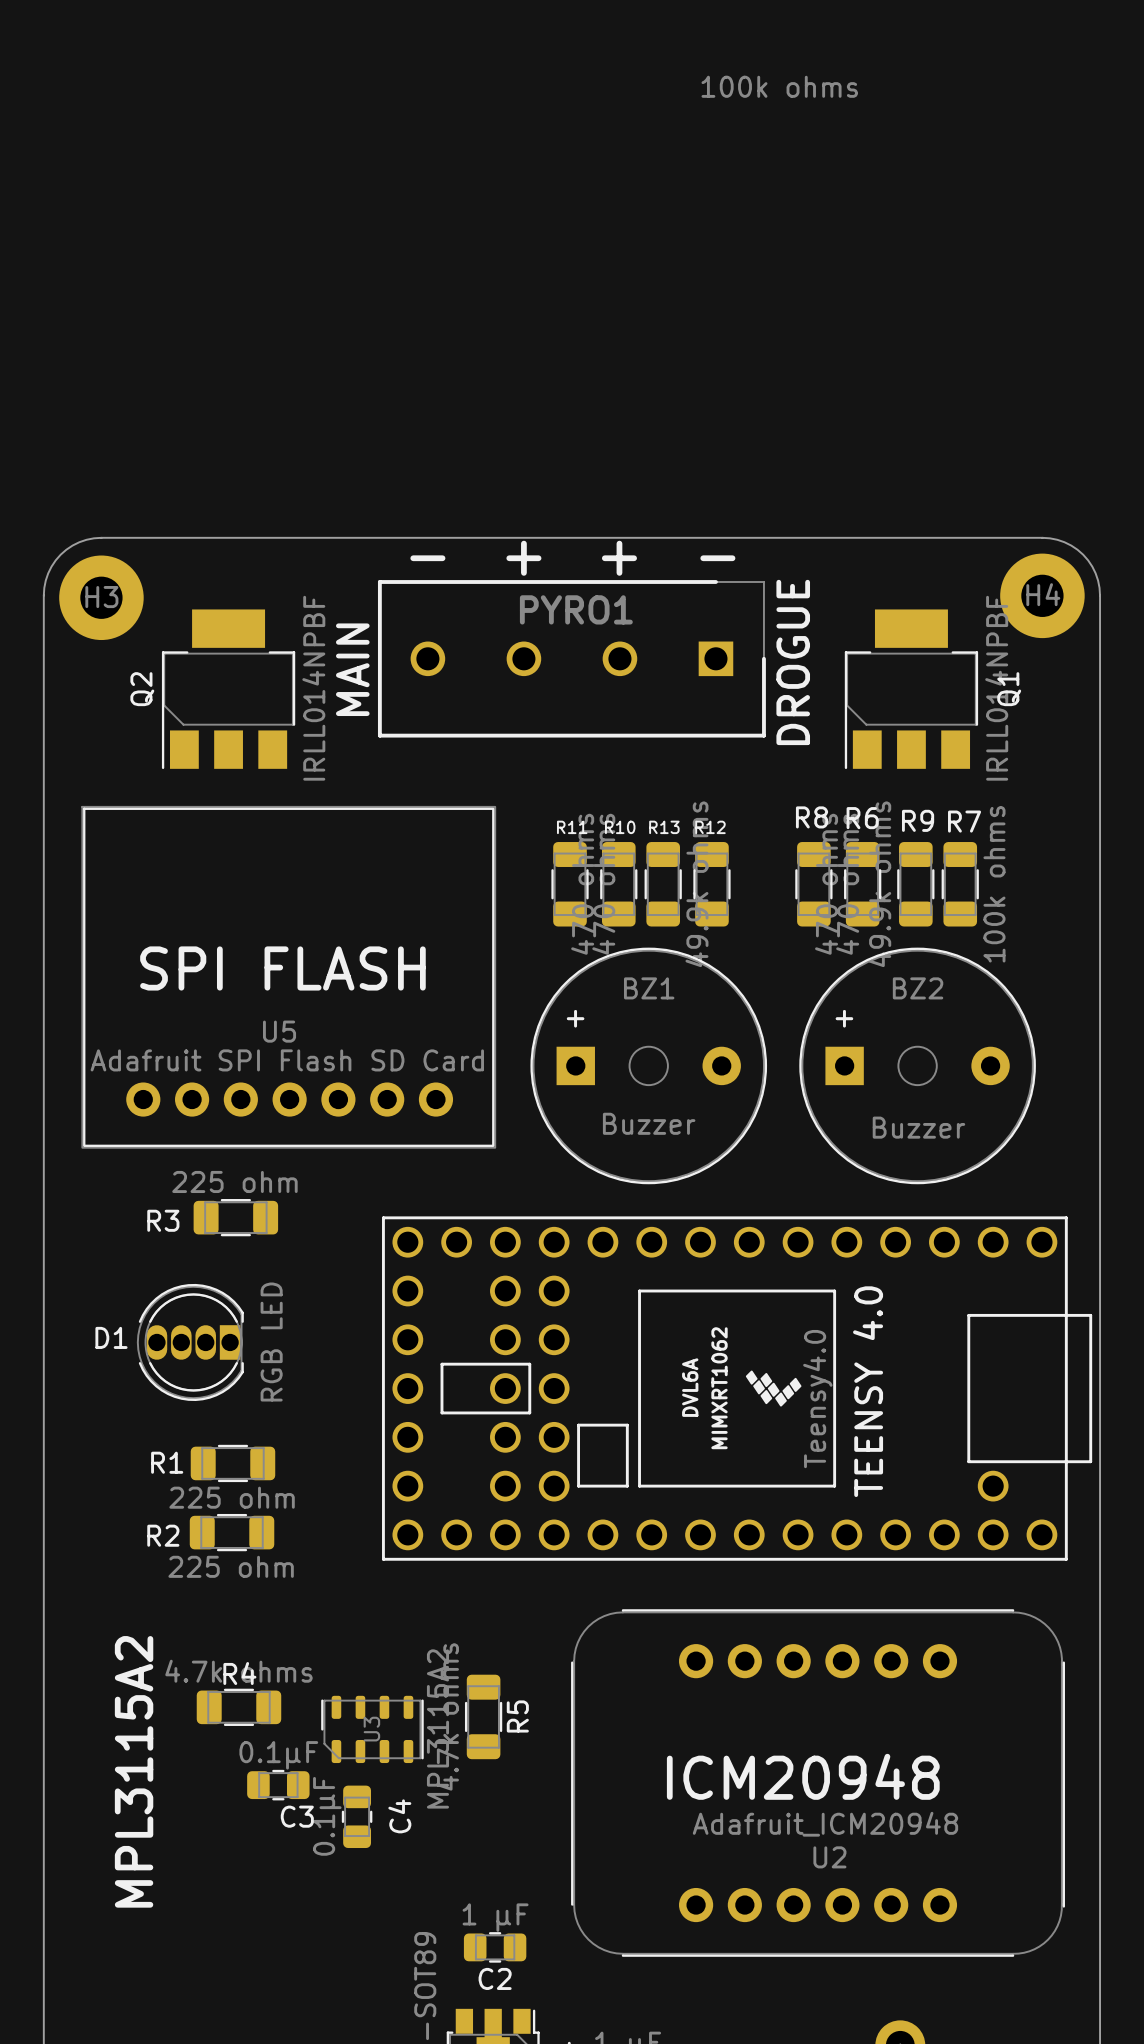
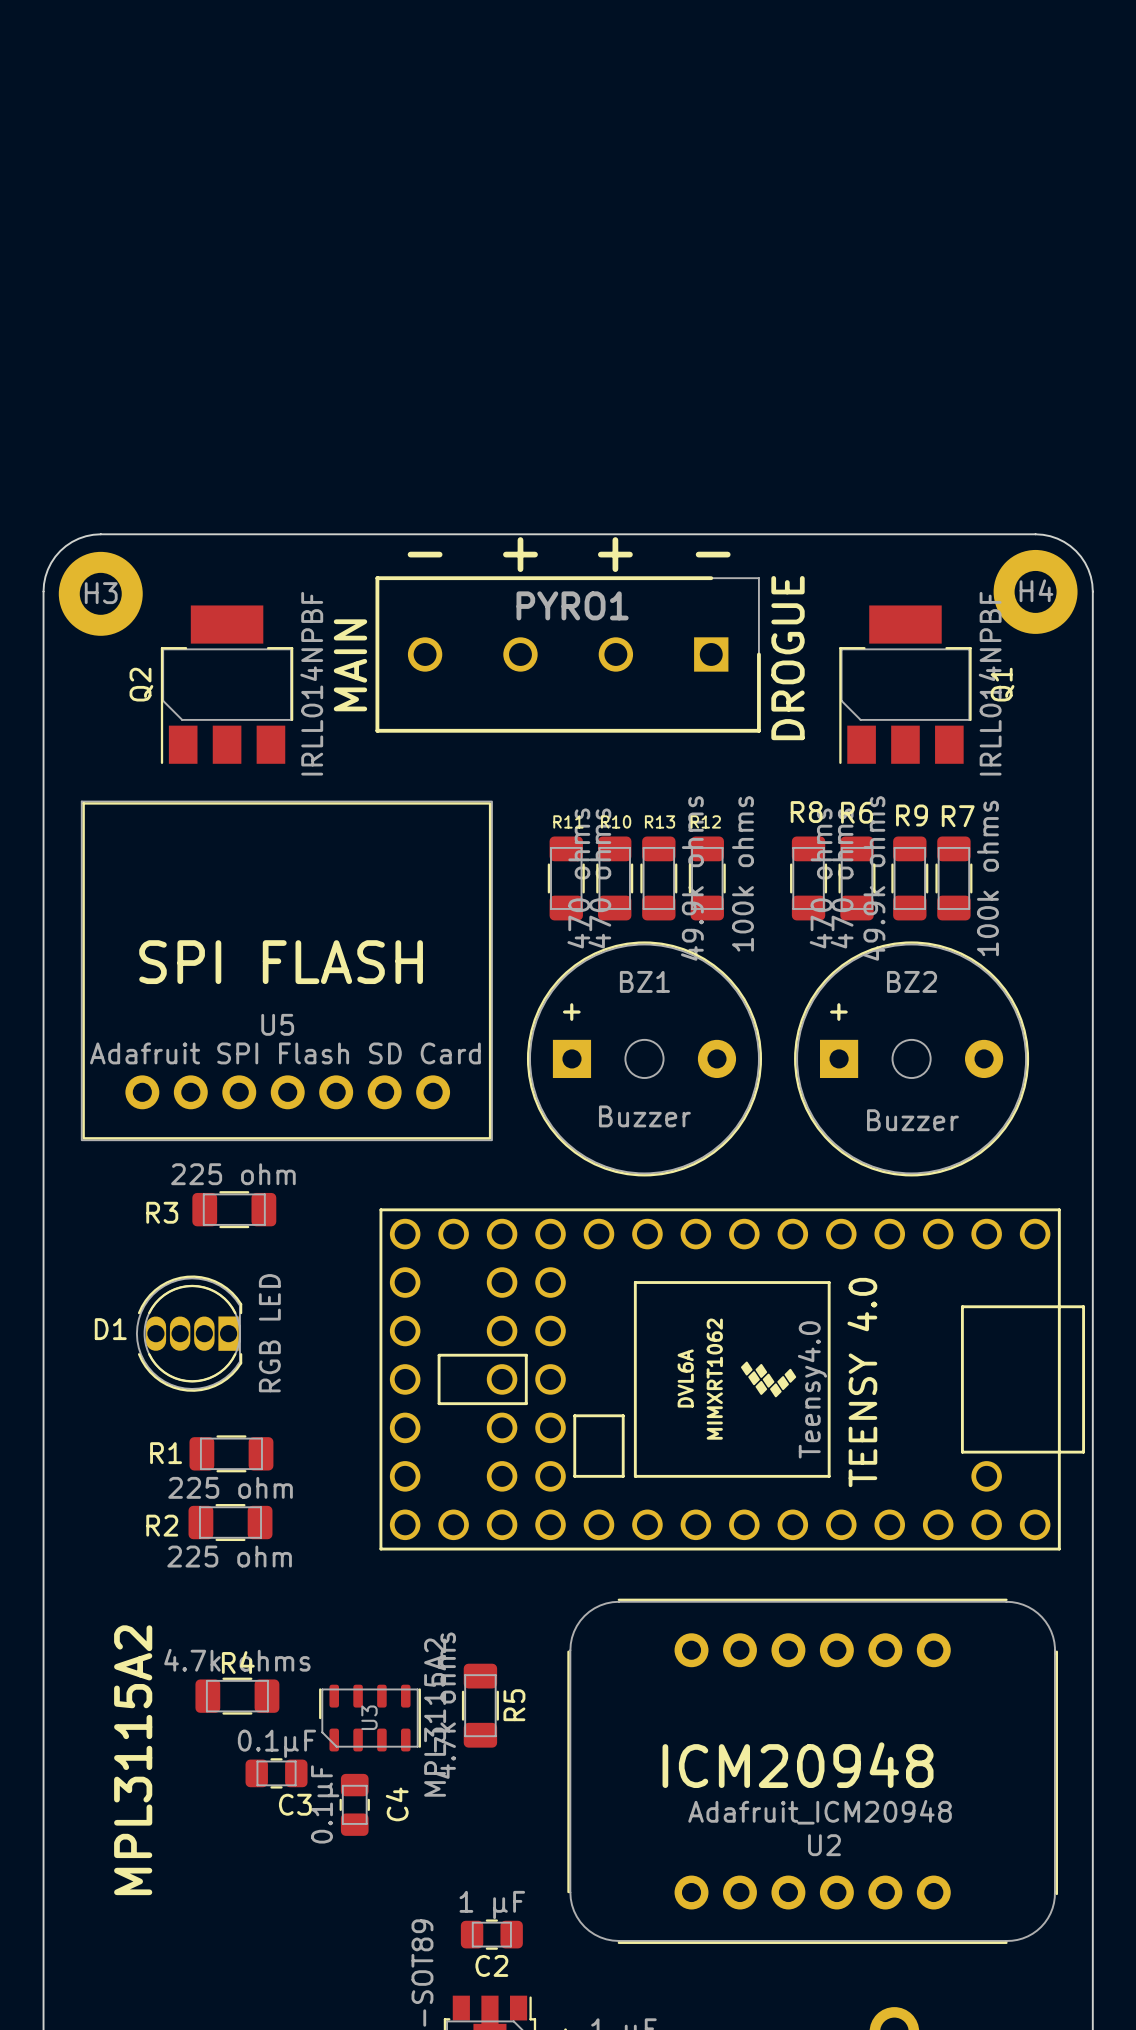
R12 value rotation: 0° (779, 86) -> 90° counterclockwise (742, 873)
R12 value position: 100k ohms (779, 86) -> 100k ohms (742, 873)

